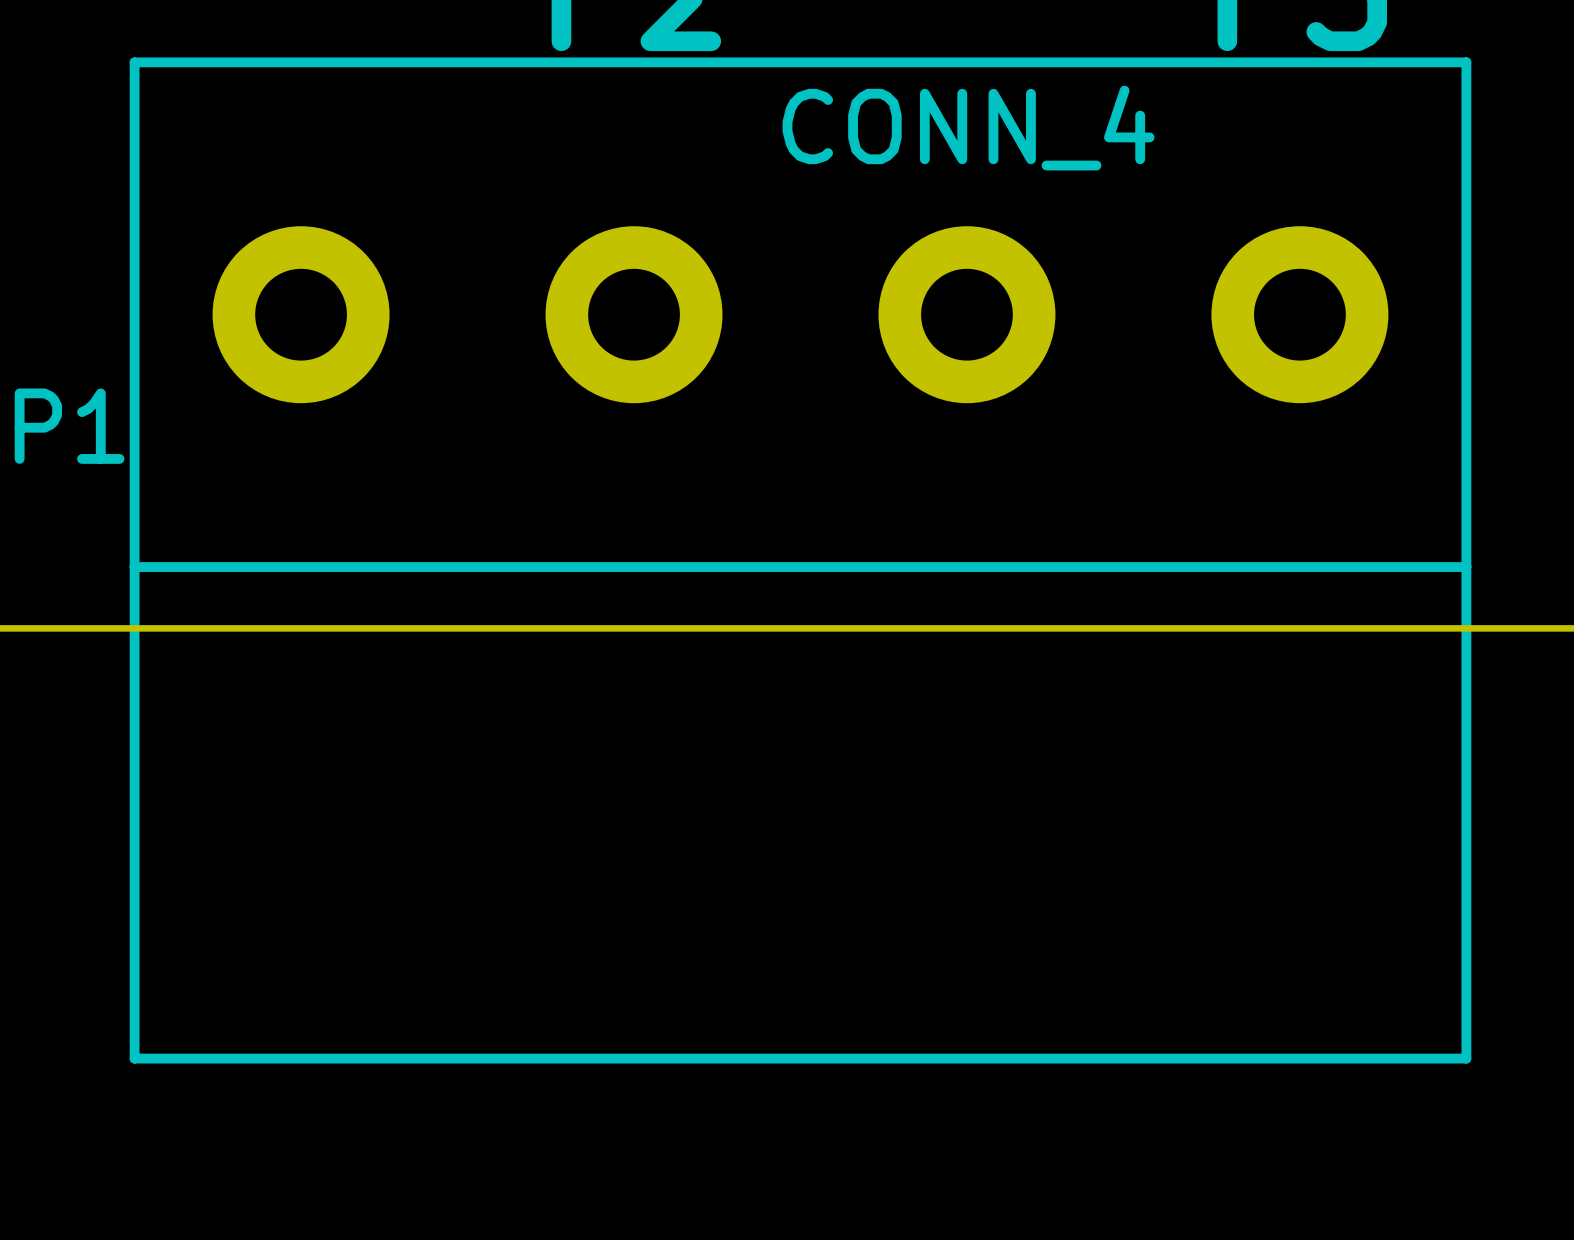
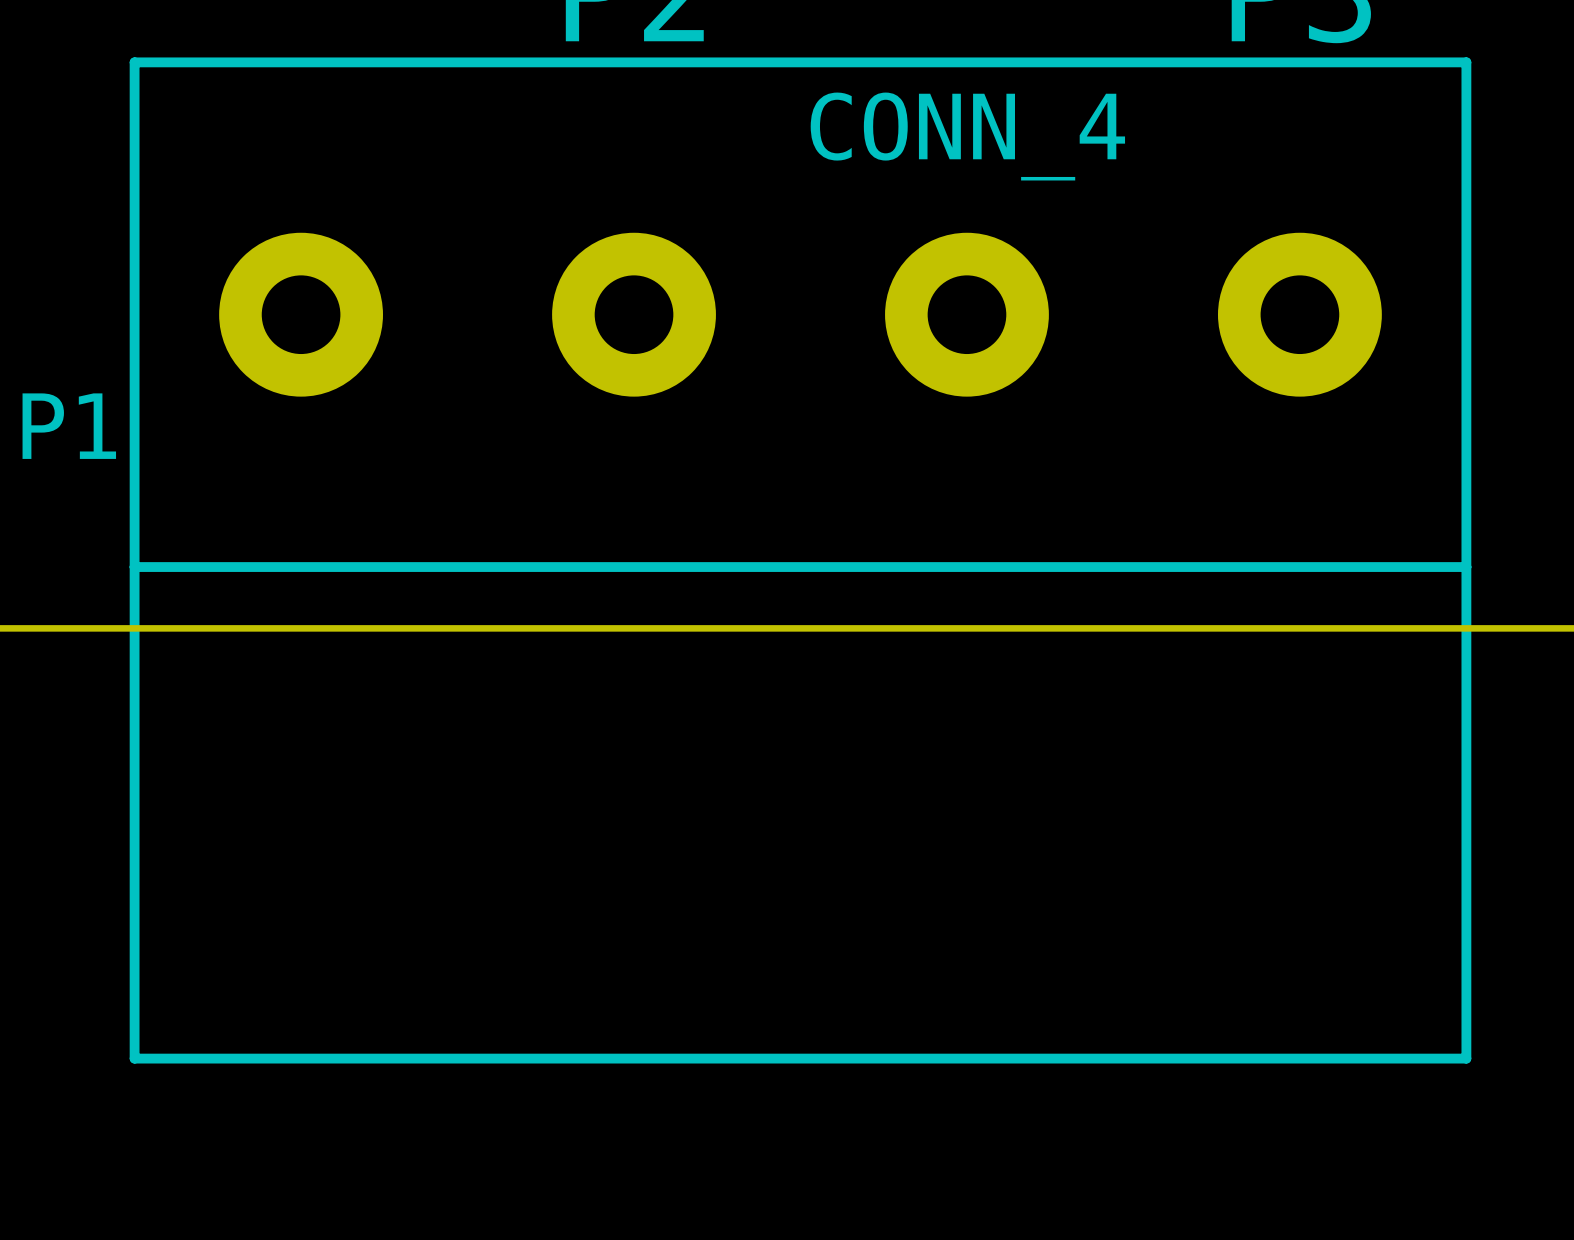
P1 footprint: [129, 57, 1472, 1064] -> [129, 57, 1472, 1064]

